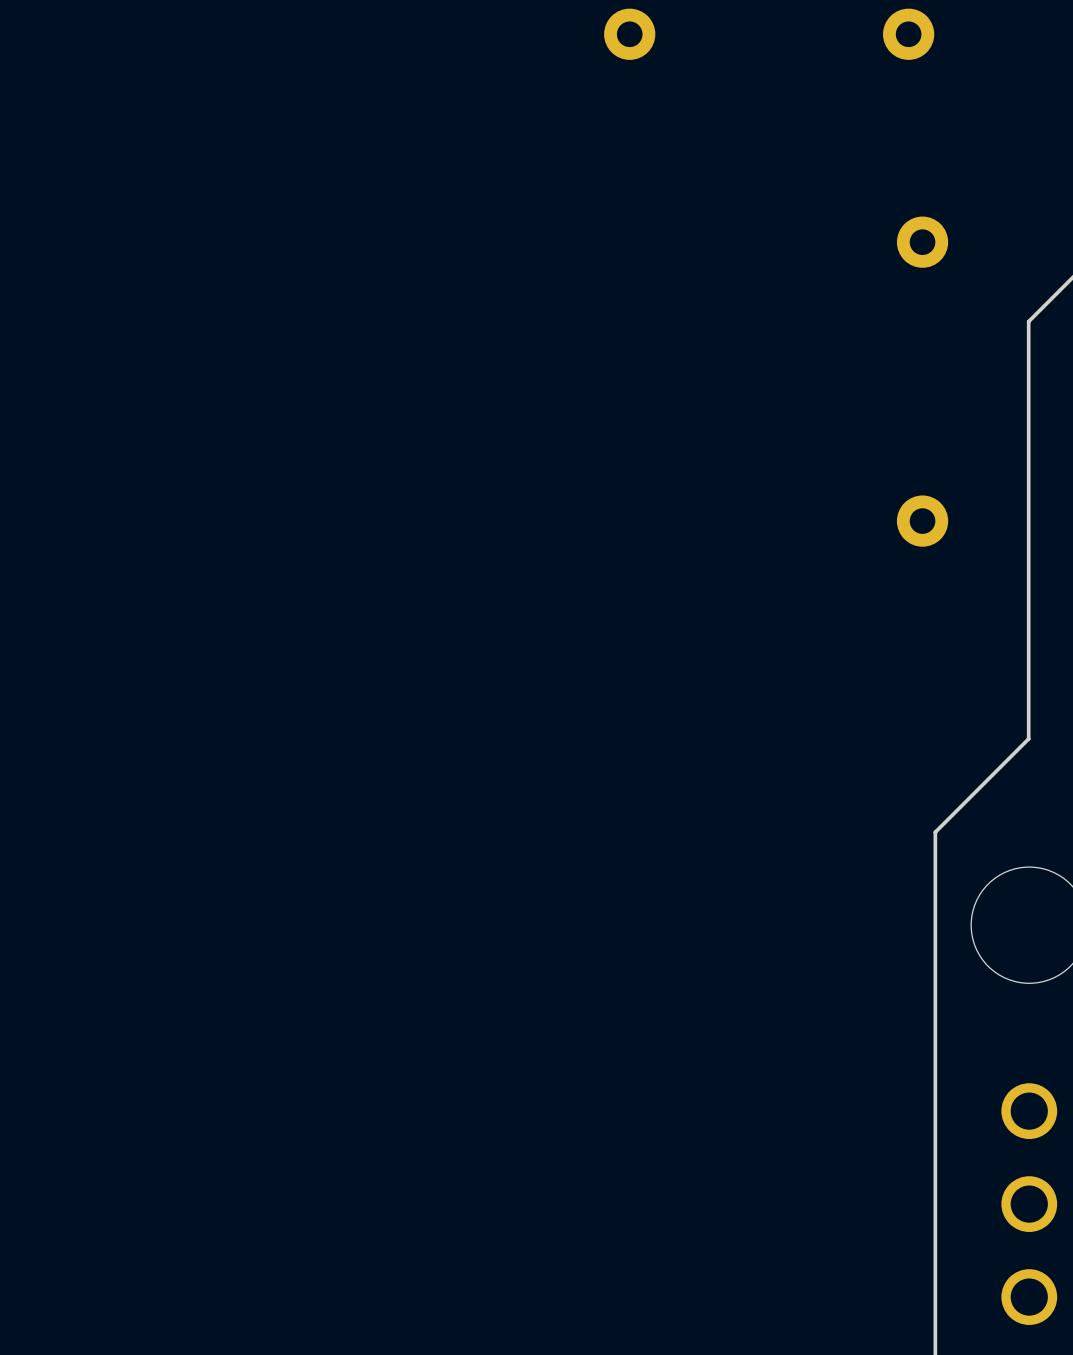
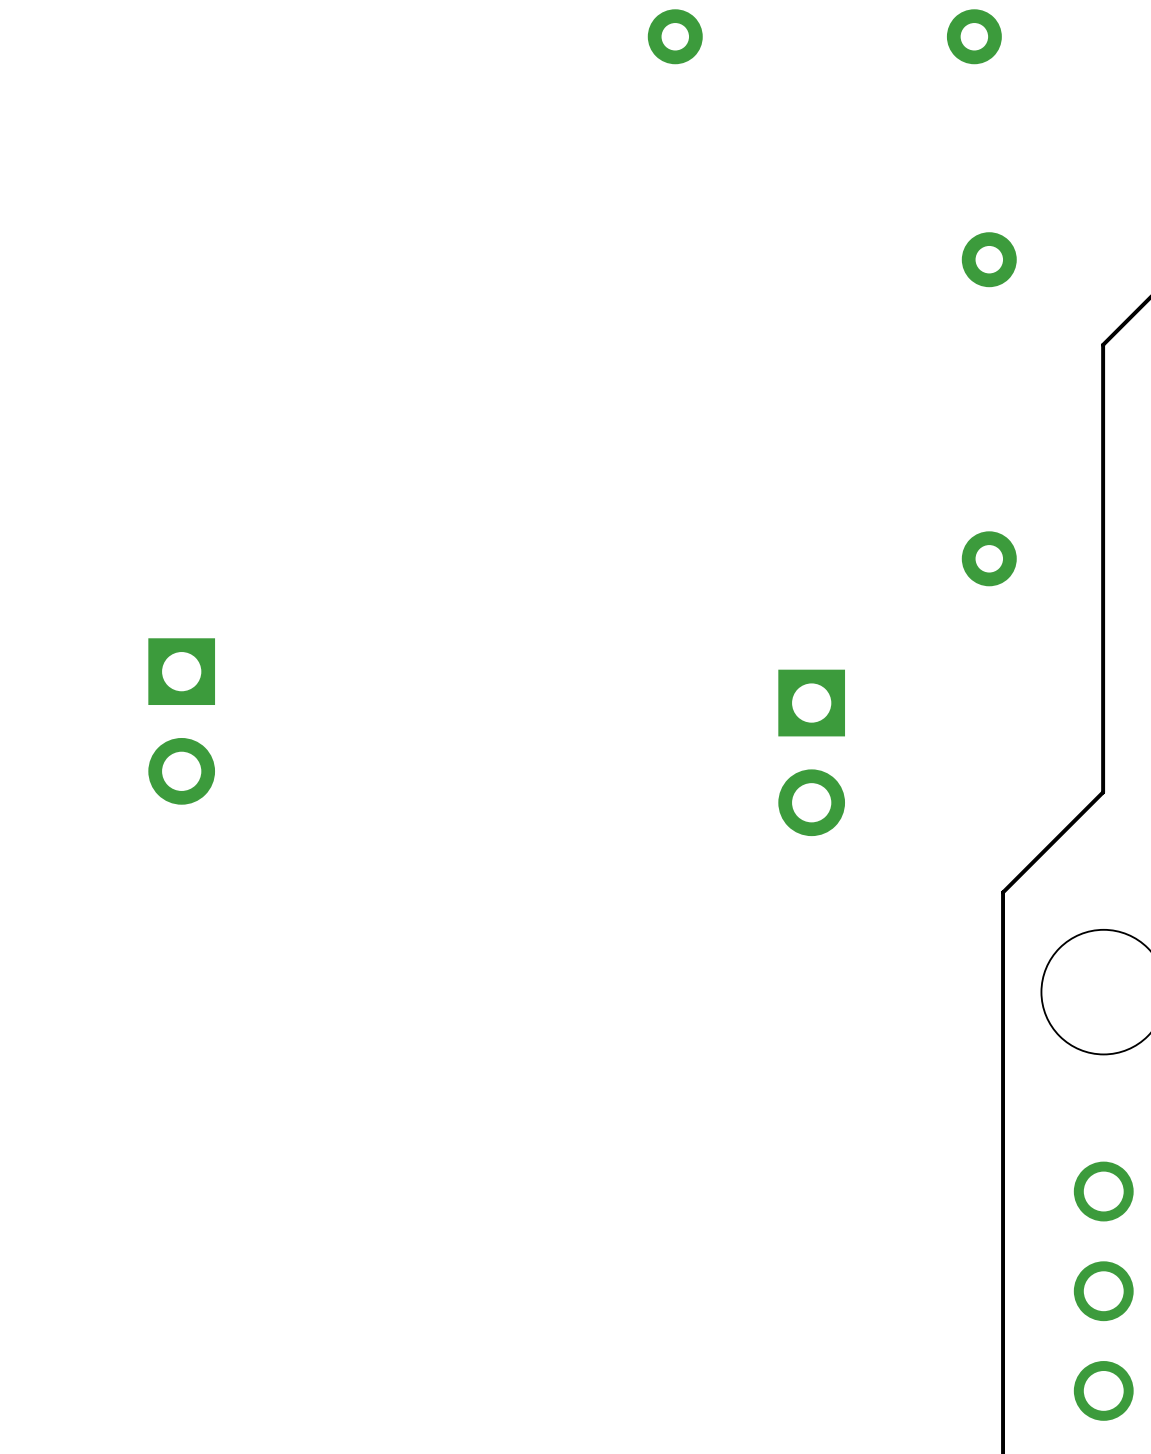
part: none -> (181, 721)
part: none -> (811, 752)

